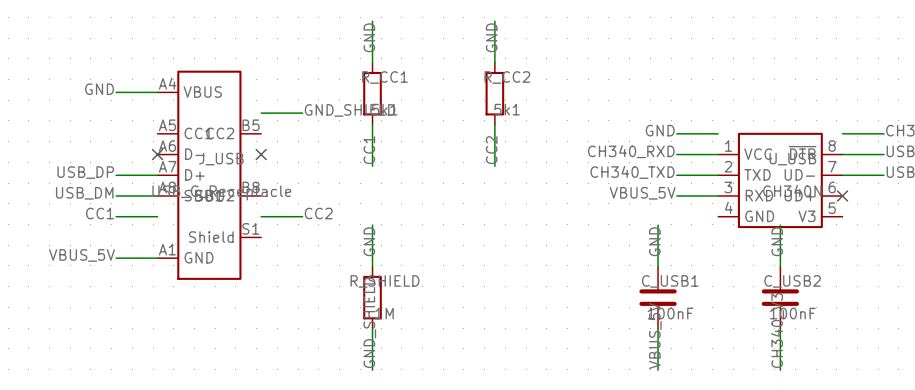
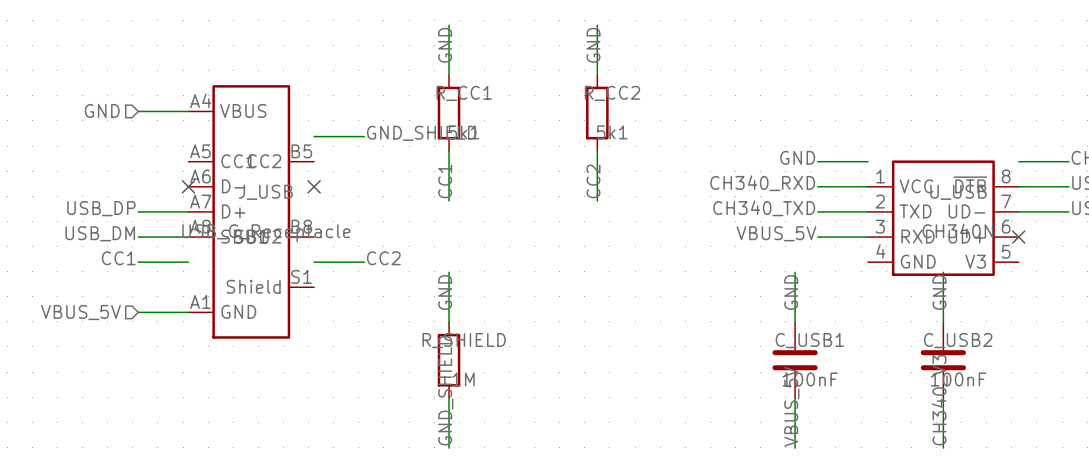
label: GND (99, 89) -> none
hierarchical label: none -> GND (102, 111)
label: VBUS_5V (82, 255) -> none
hierarchical label: none -> VBUS_5V (80, 312)

